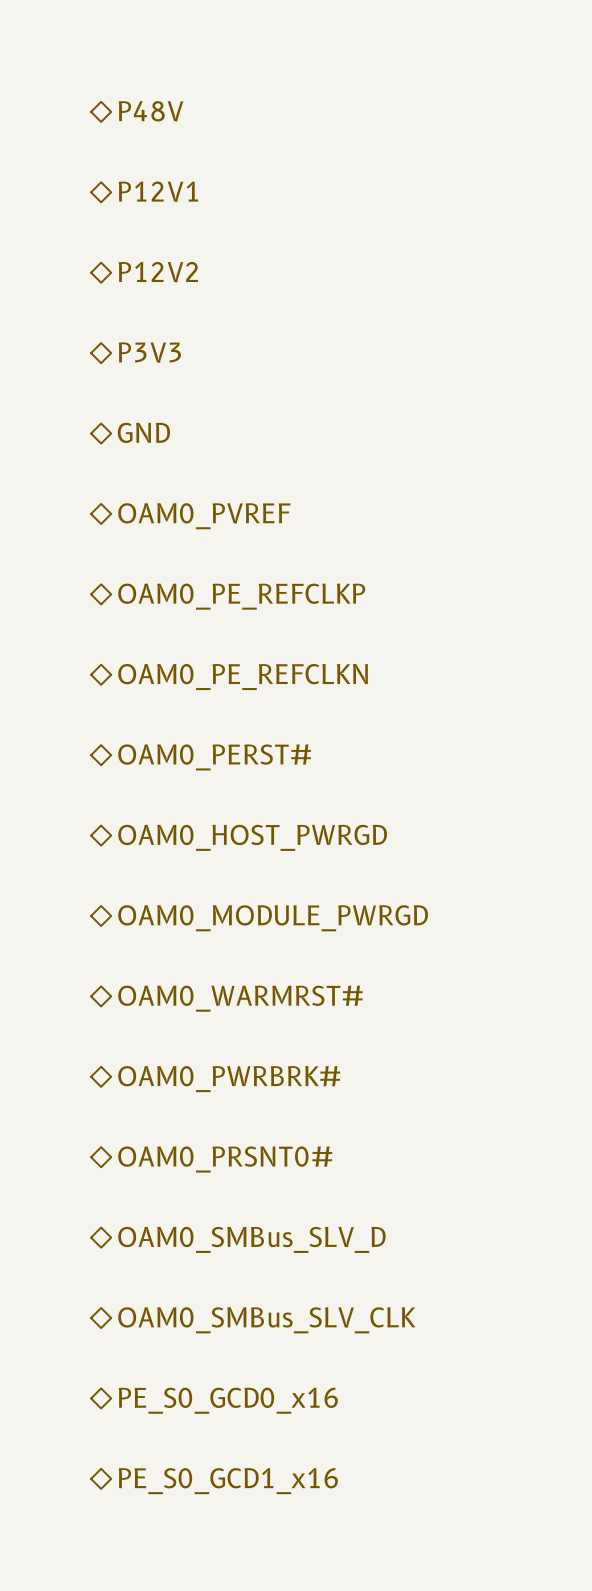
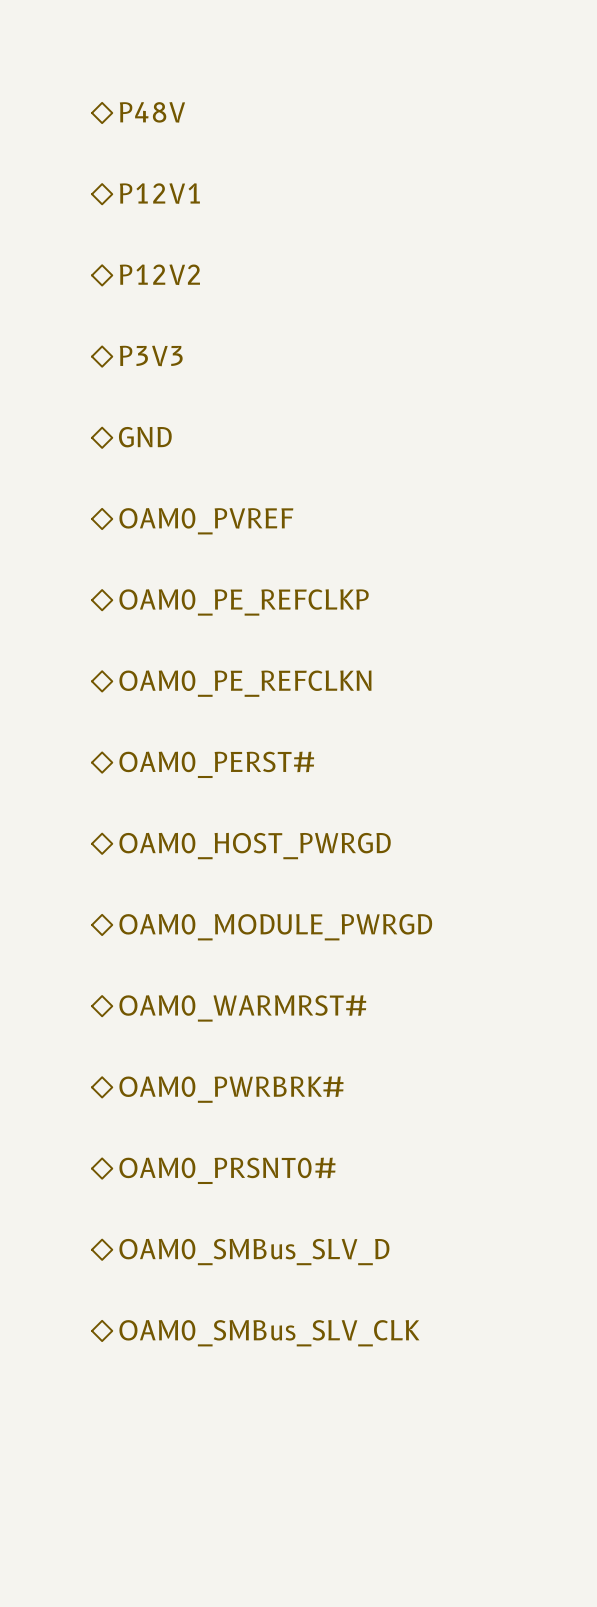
hierarchical label: PE_S0_GCD0_x16 (228, 1400) -> none
hierarchical label: PE_S0_GCD1_x16 (228, 1481) -> none

